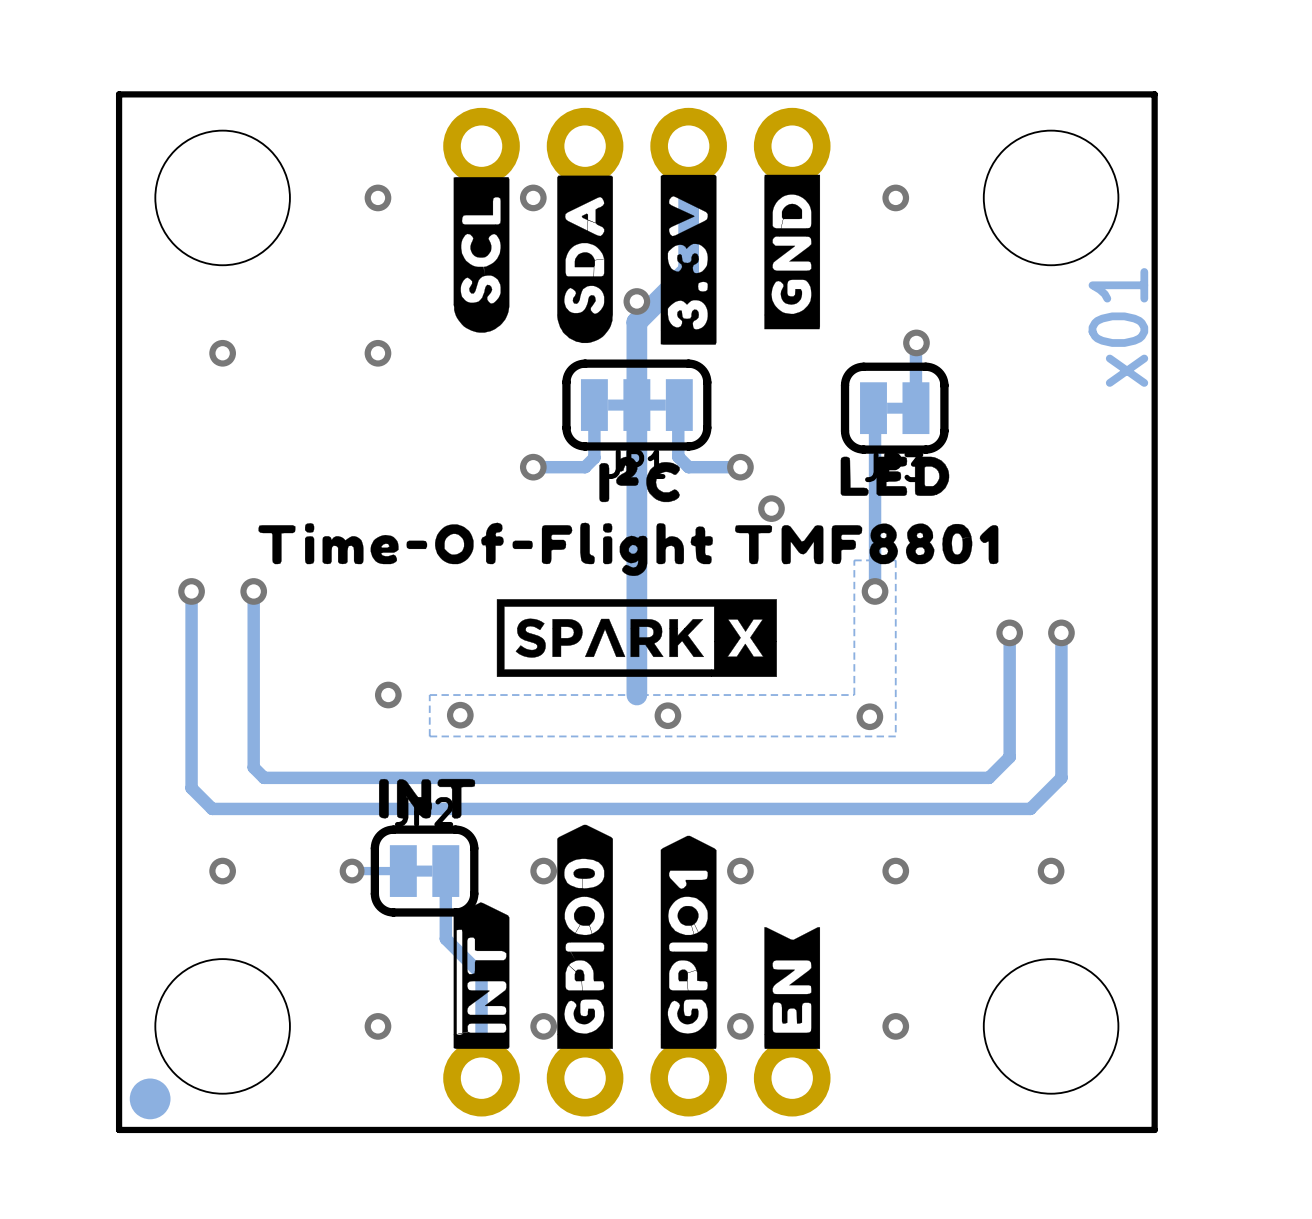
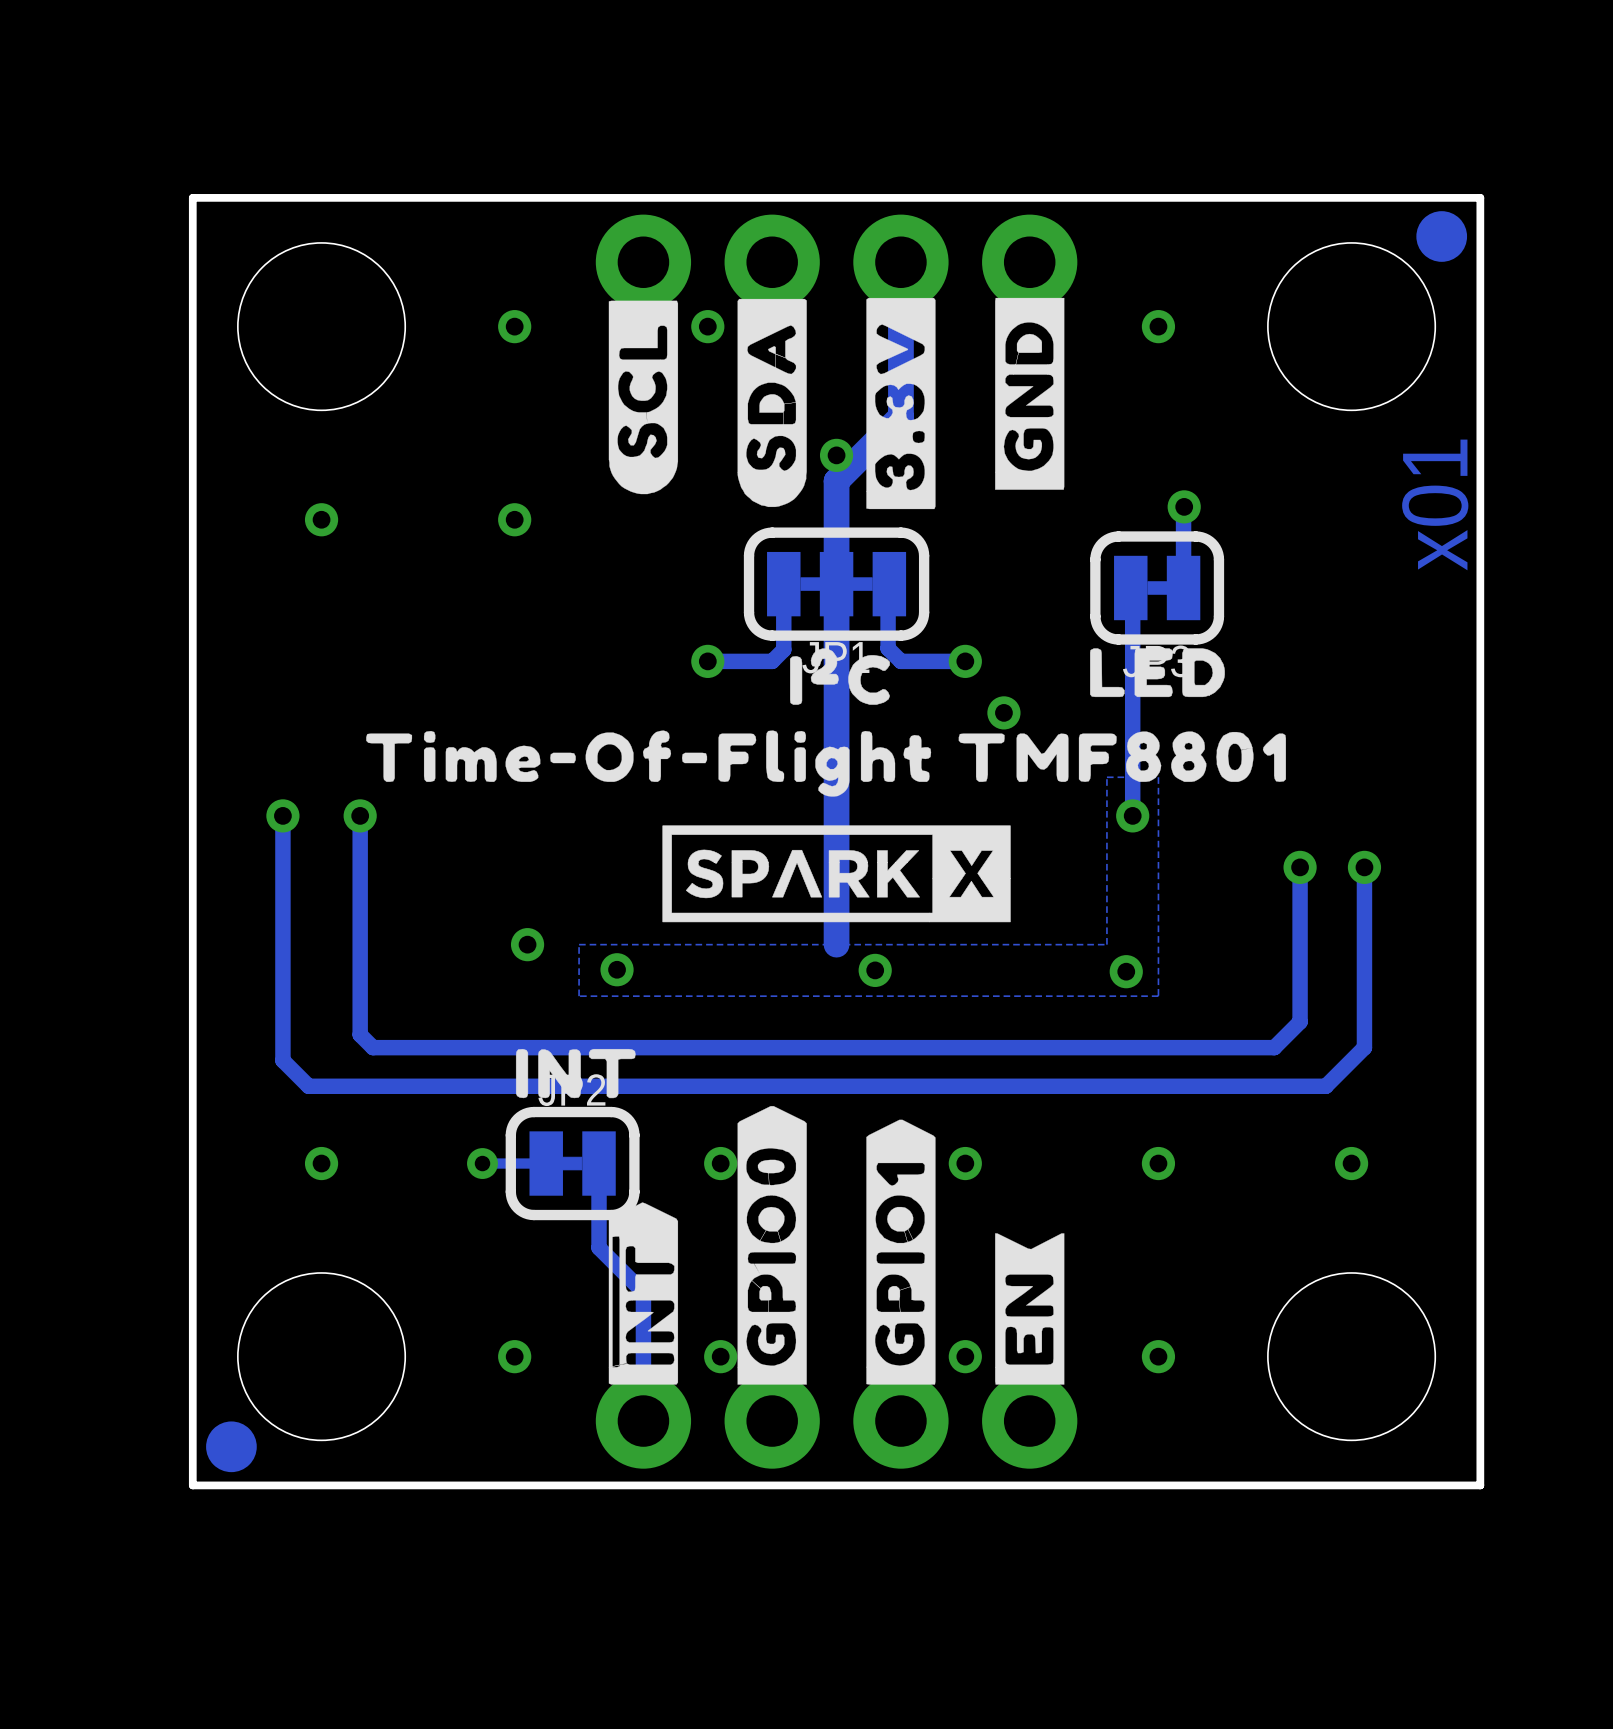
part: none -> (1441, 236)

